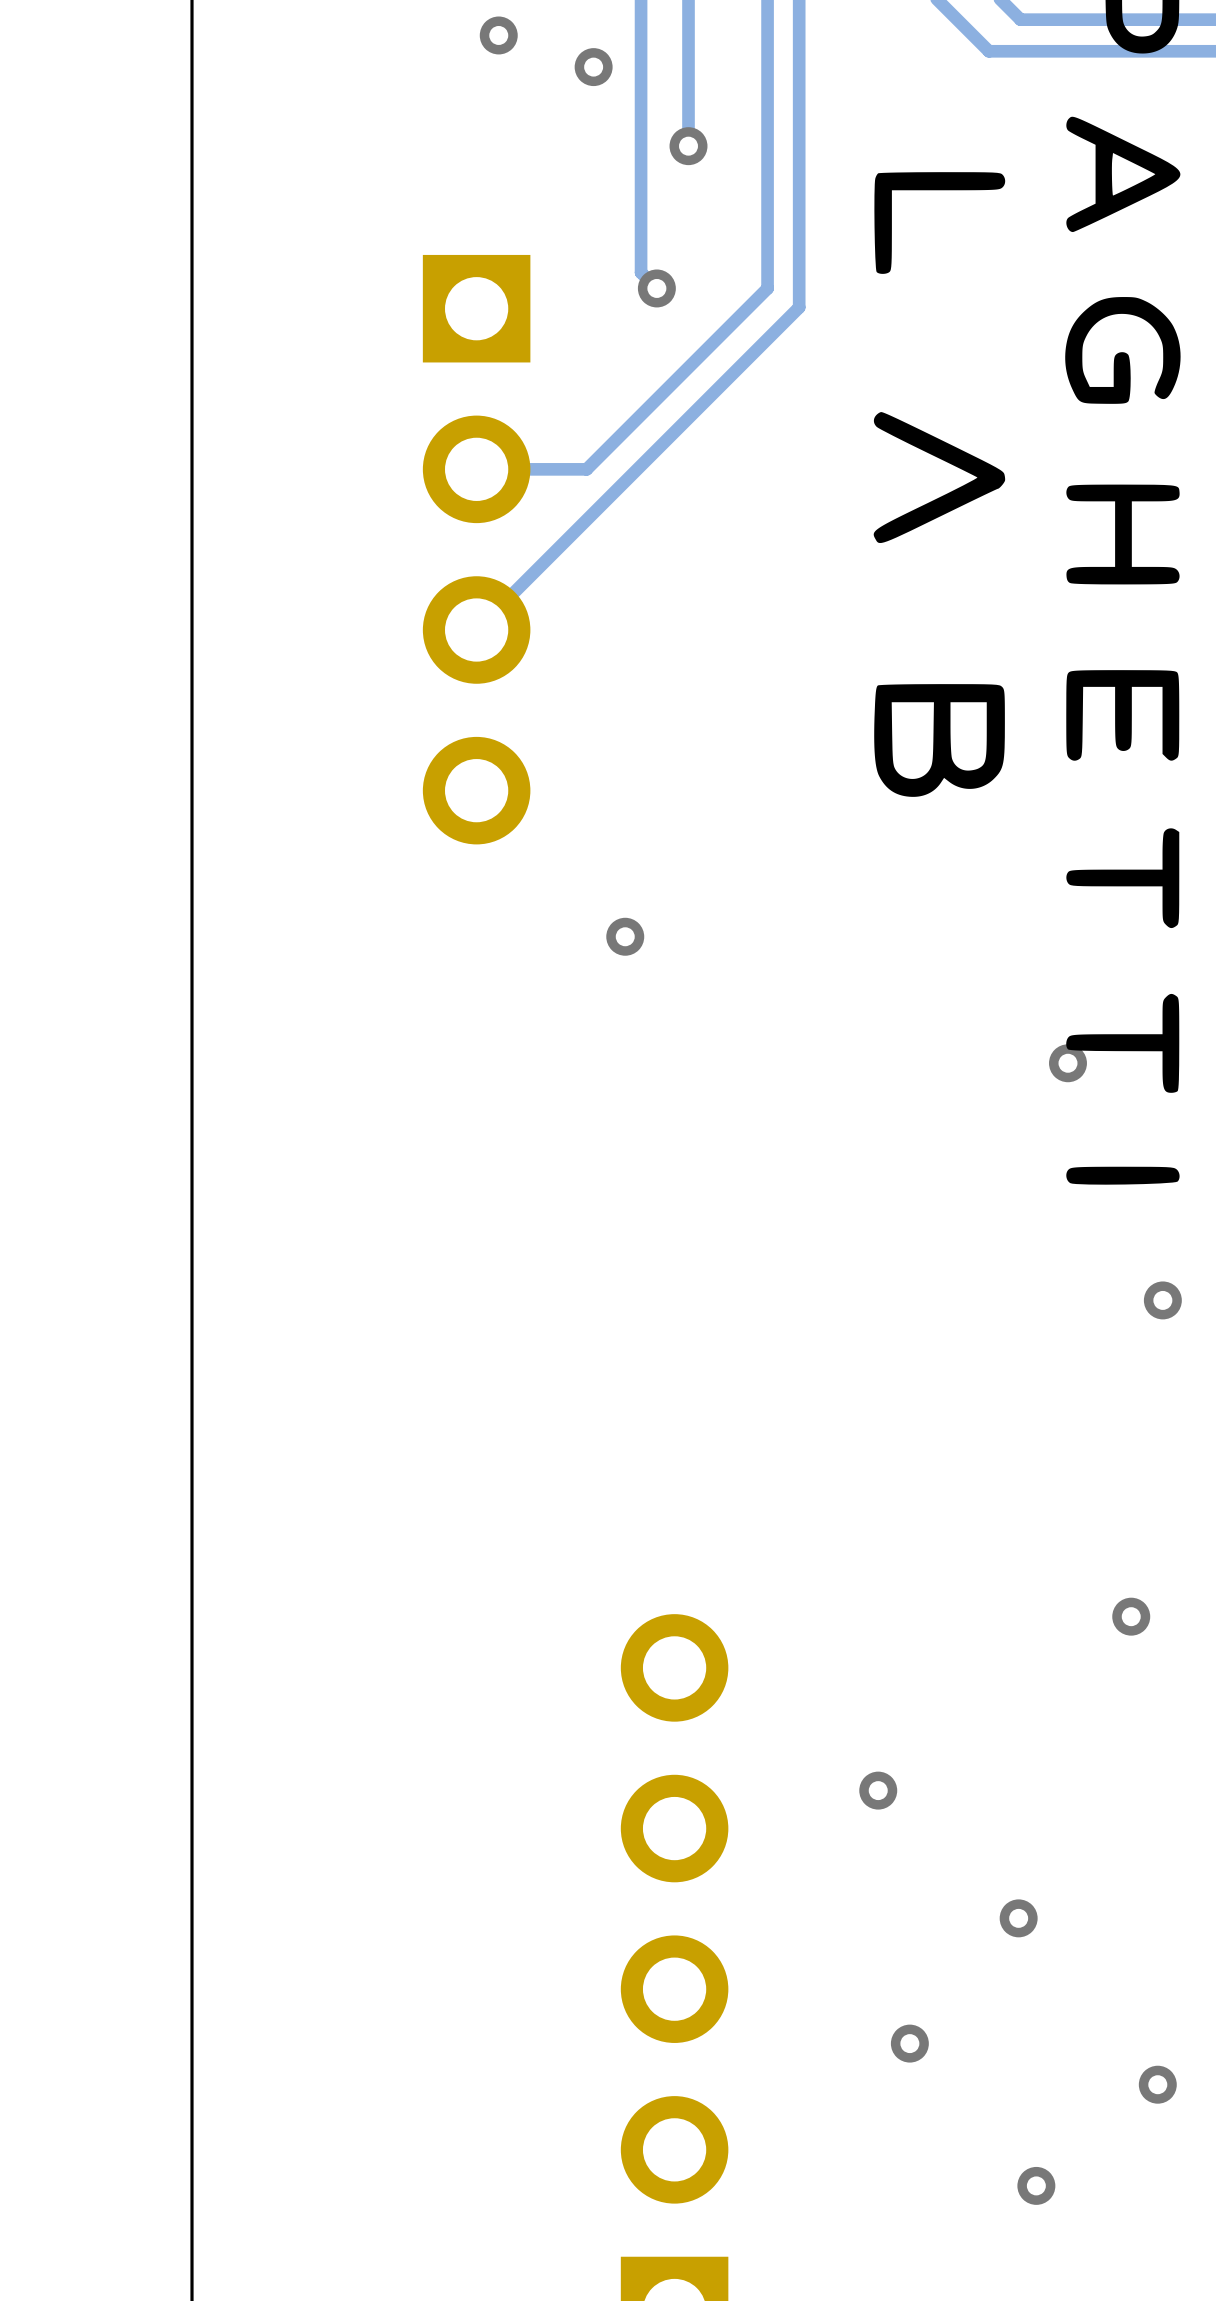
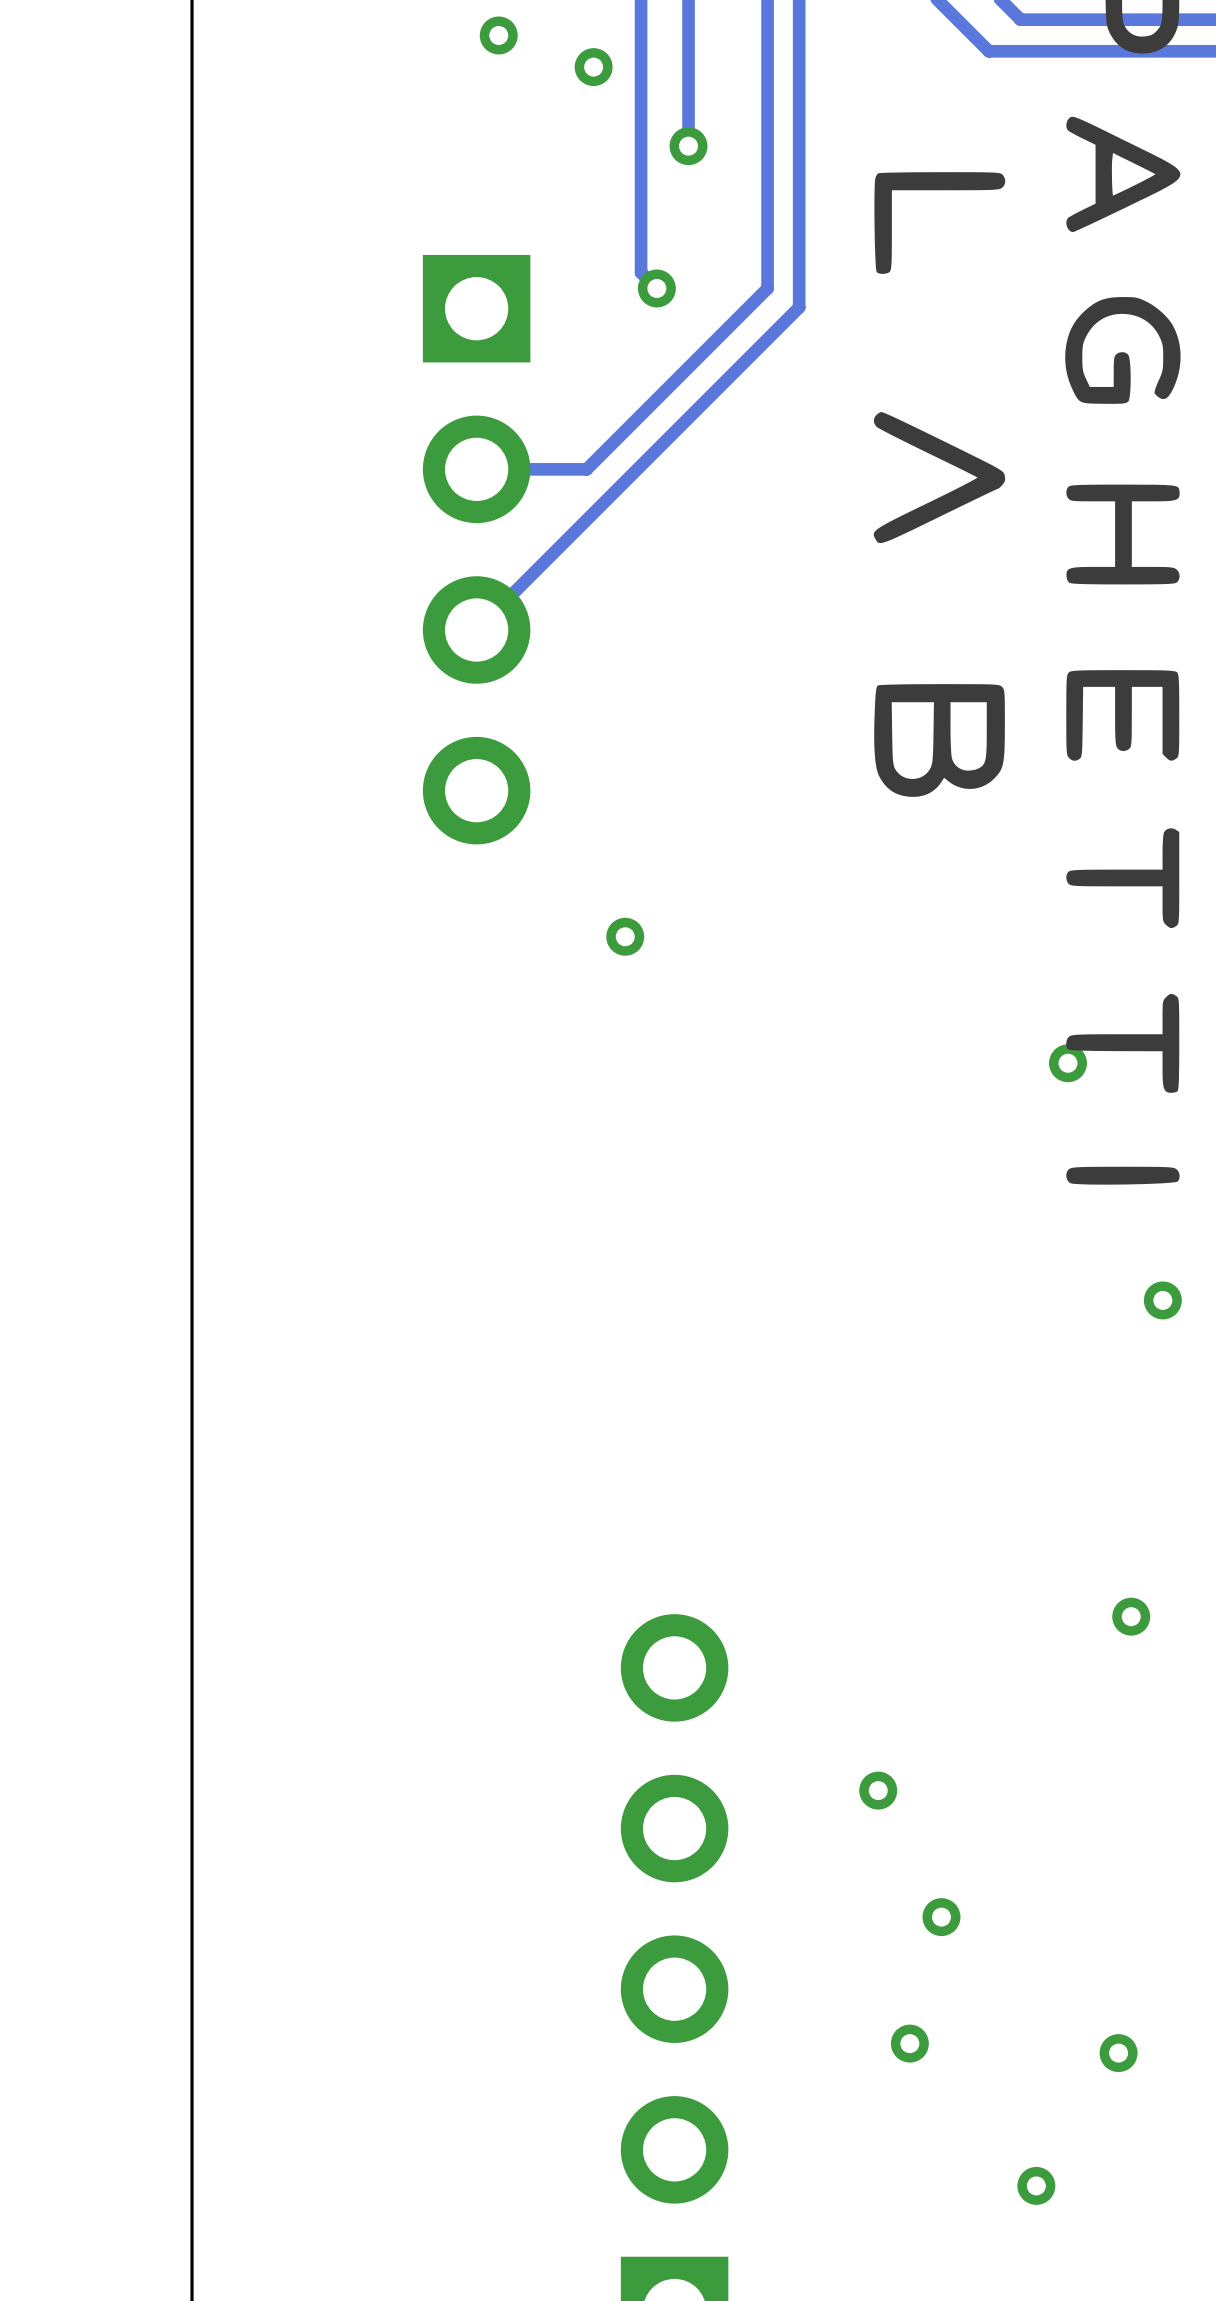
via position: (1018, 1918) -> (941, 1917)
via position: (1157, 2084) -> (1118, 2053)

